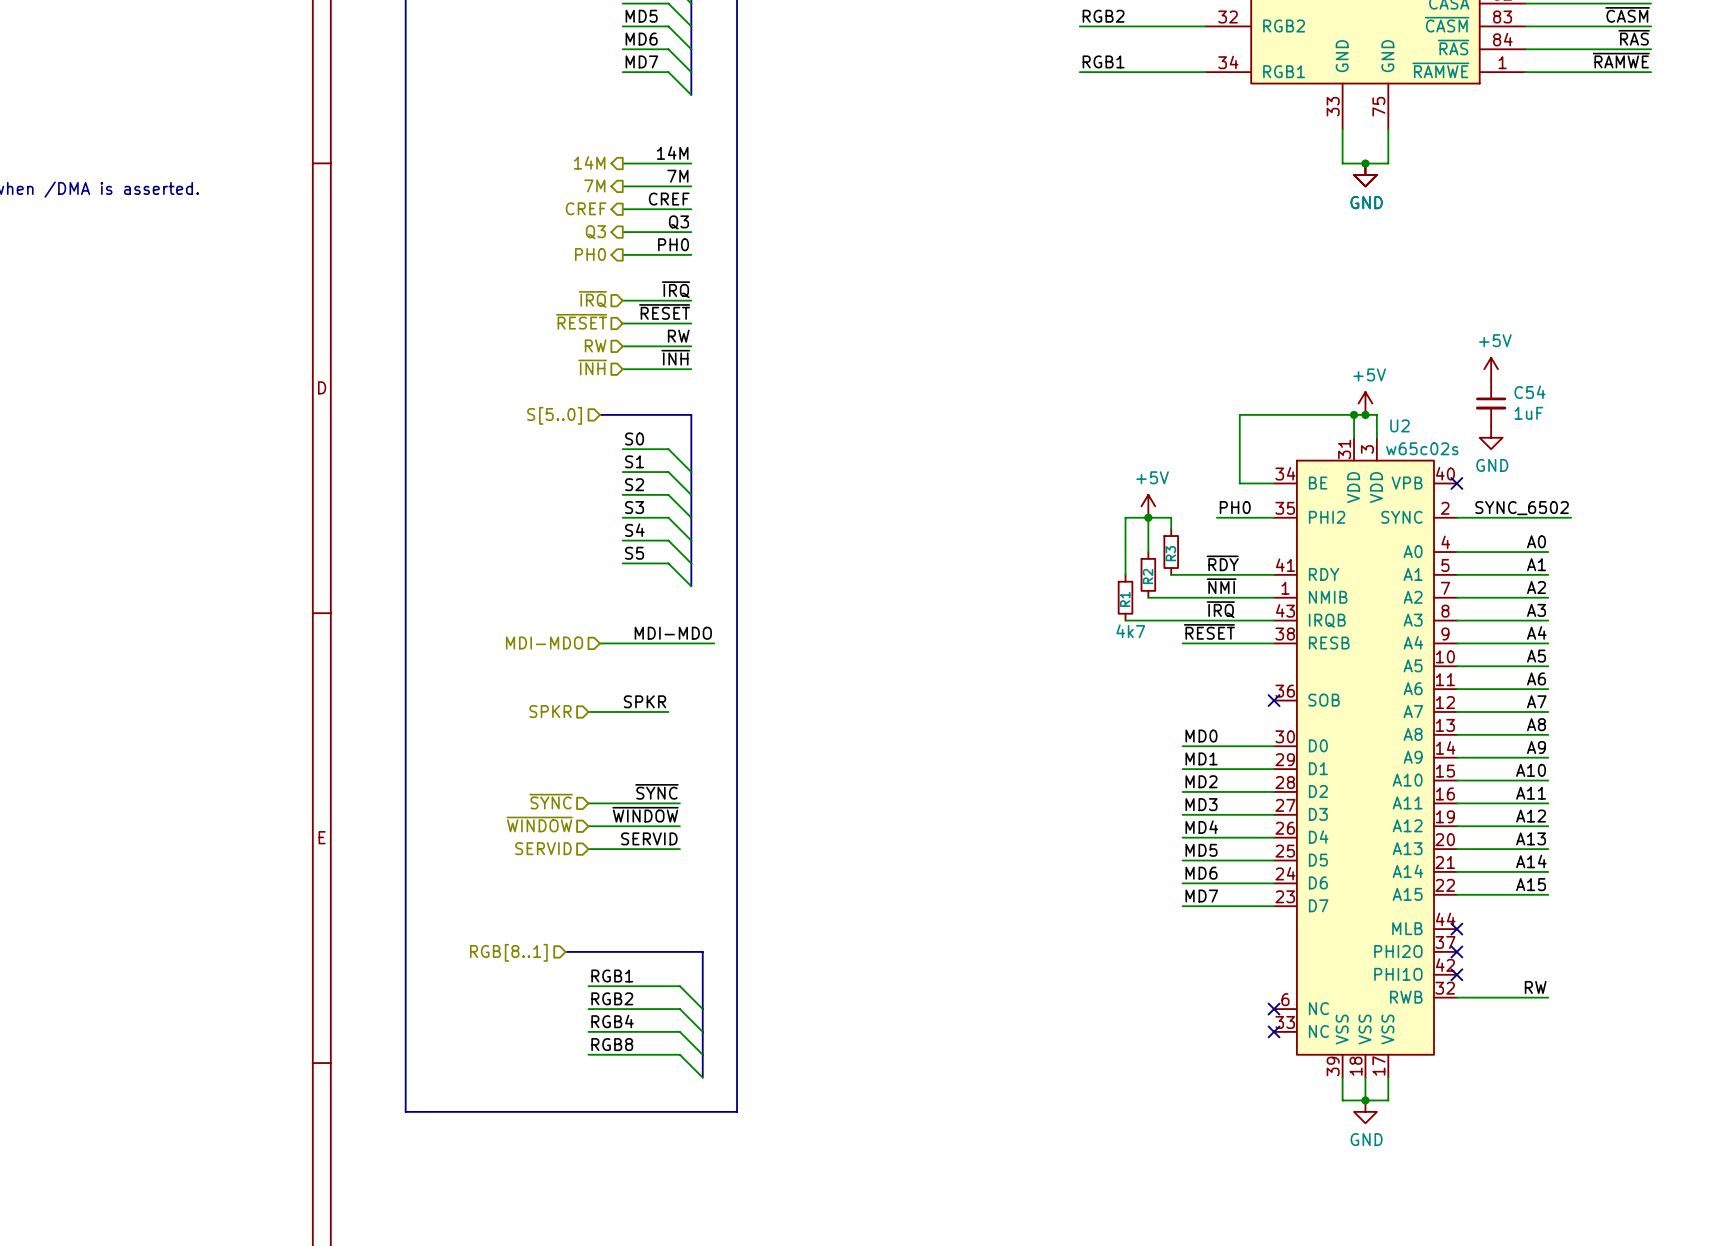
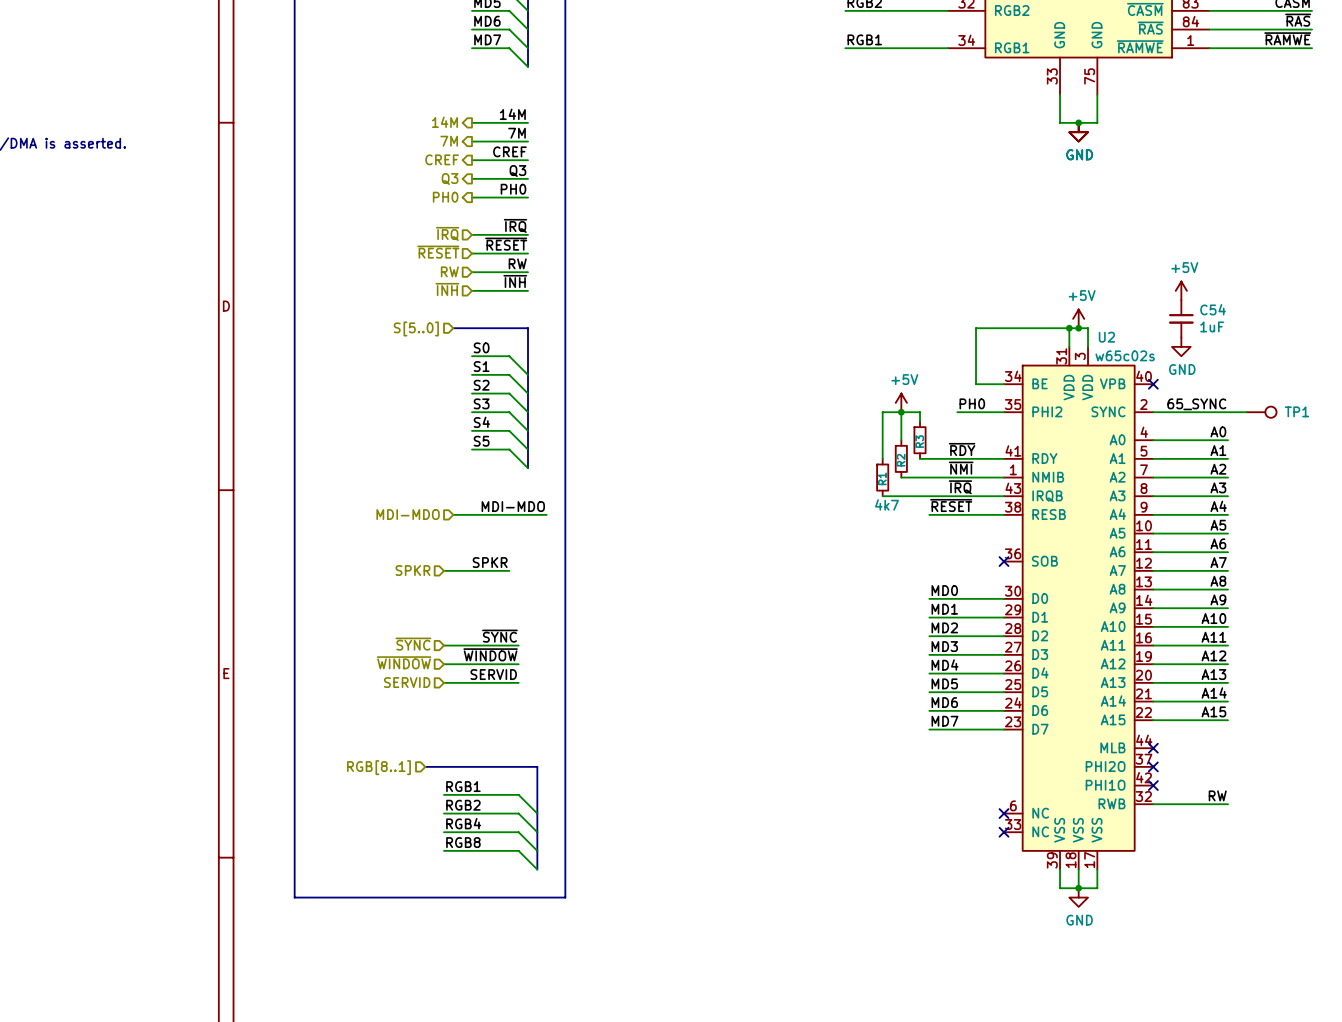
label: none -> 65_SYNC (1196, 404)
label: SYNC_6502 (1522, 508) -> none
TP1: none -> (1261, 412)

